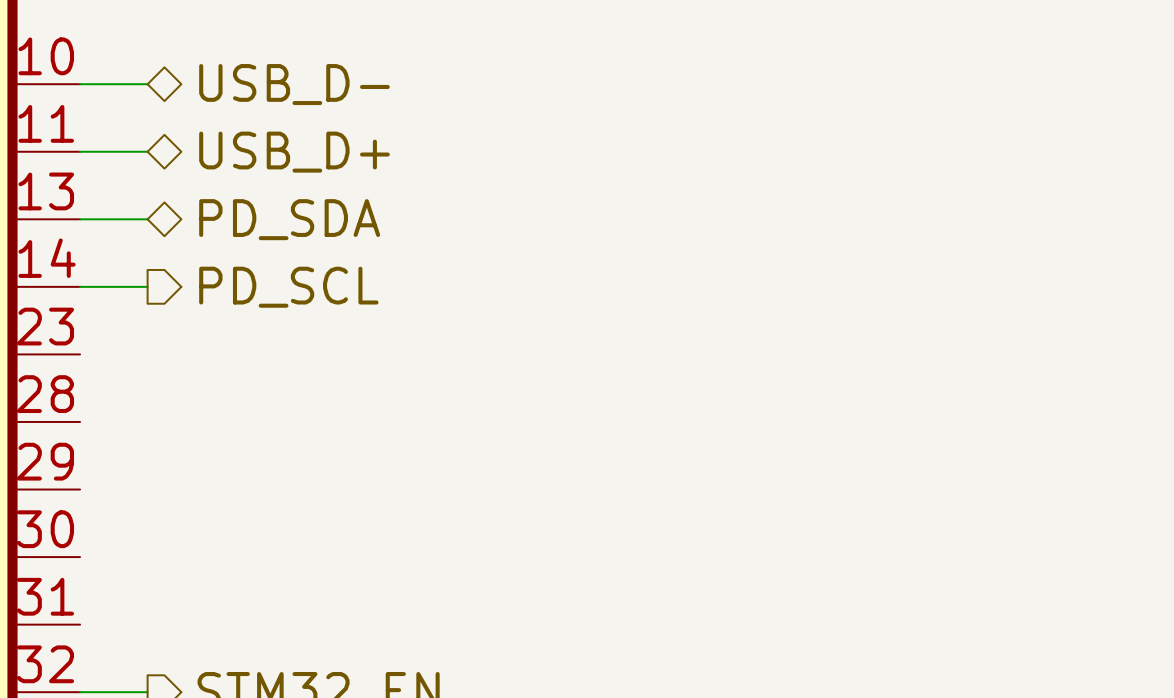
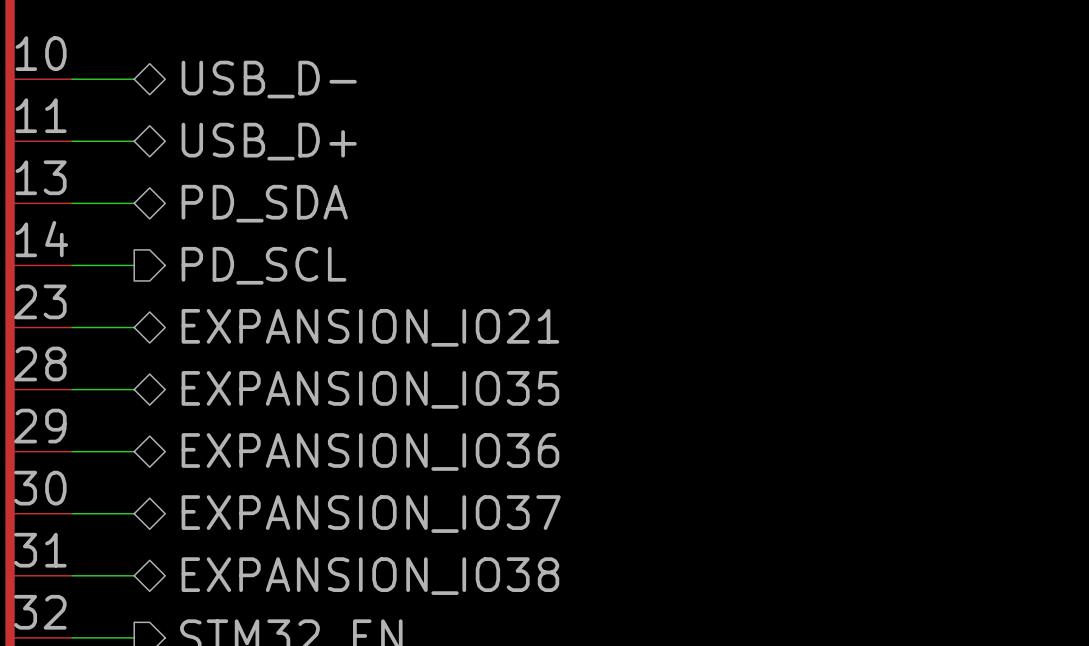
wire: none -> (72, 327) (134, 327)
hierarchical label: none -> EXPANSION_IO21 (370, 327)
wire: none -> (72, 389) (134, 389)
hierarchical label: none -> EXPANSION_IO35 (370, 389)
wire: none -> (72, 451) (134, 451)
hierarchical label: none -> EXPANSION_IO36 (370, 451)
wire: none -> (72, 513) (134, 513)
hierarchical label: none -> EXPANSION_IO37 (371, 514)
wire: none -> (72, 575) (134, 575)
hierarchical label: none -> EXPANSION_IO38 (370, 576)

